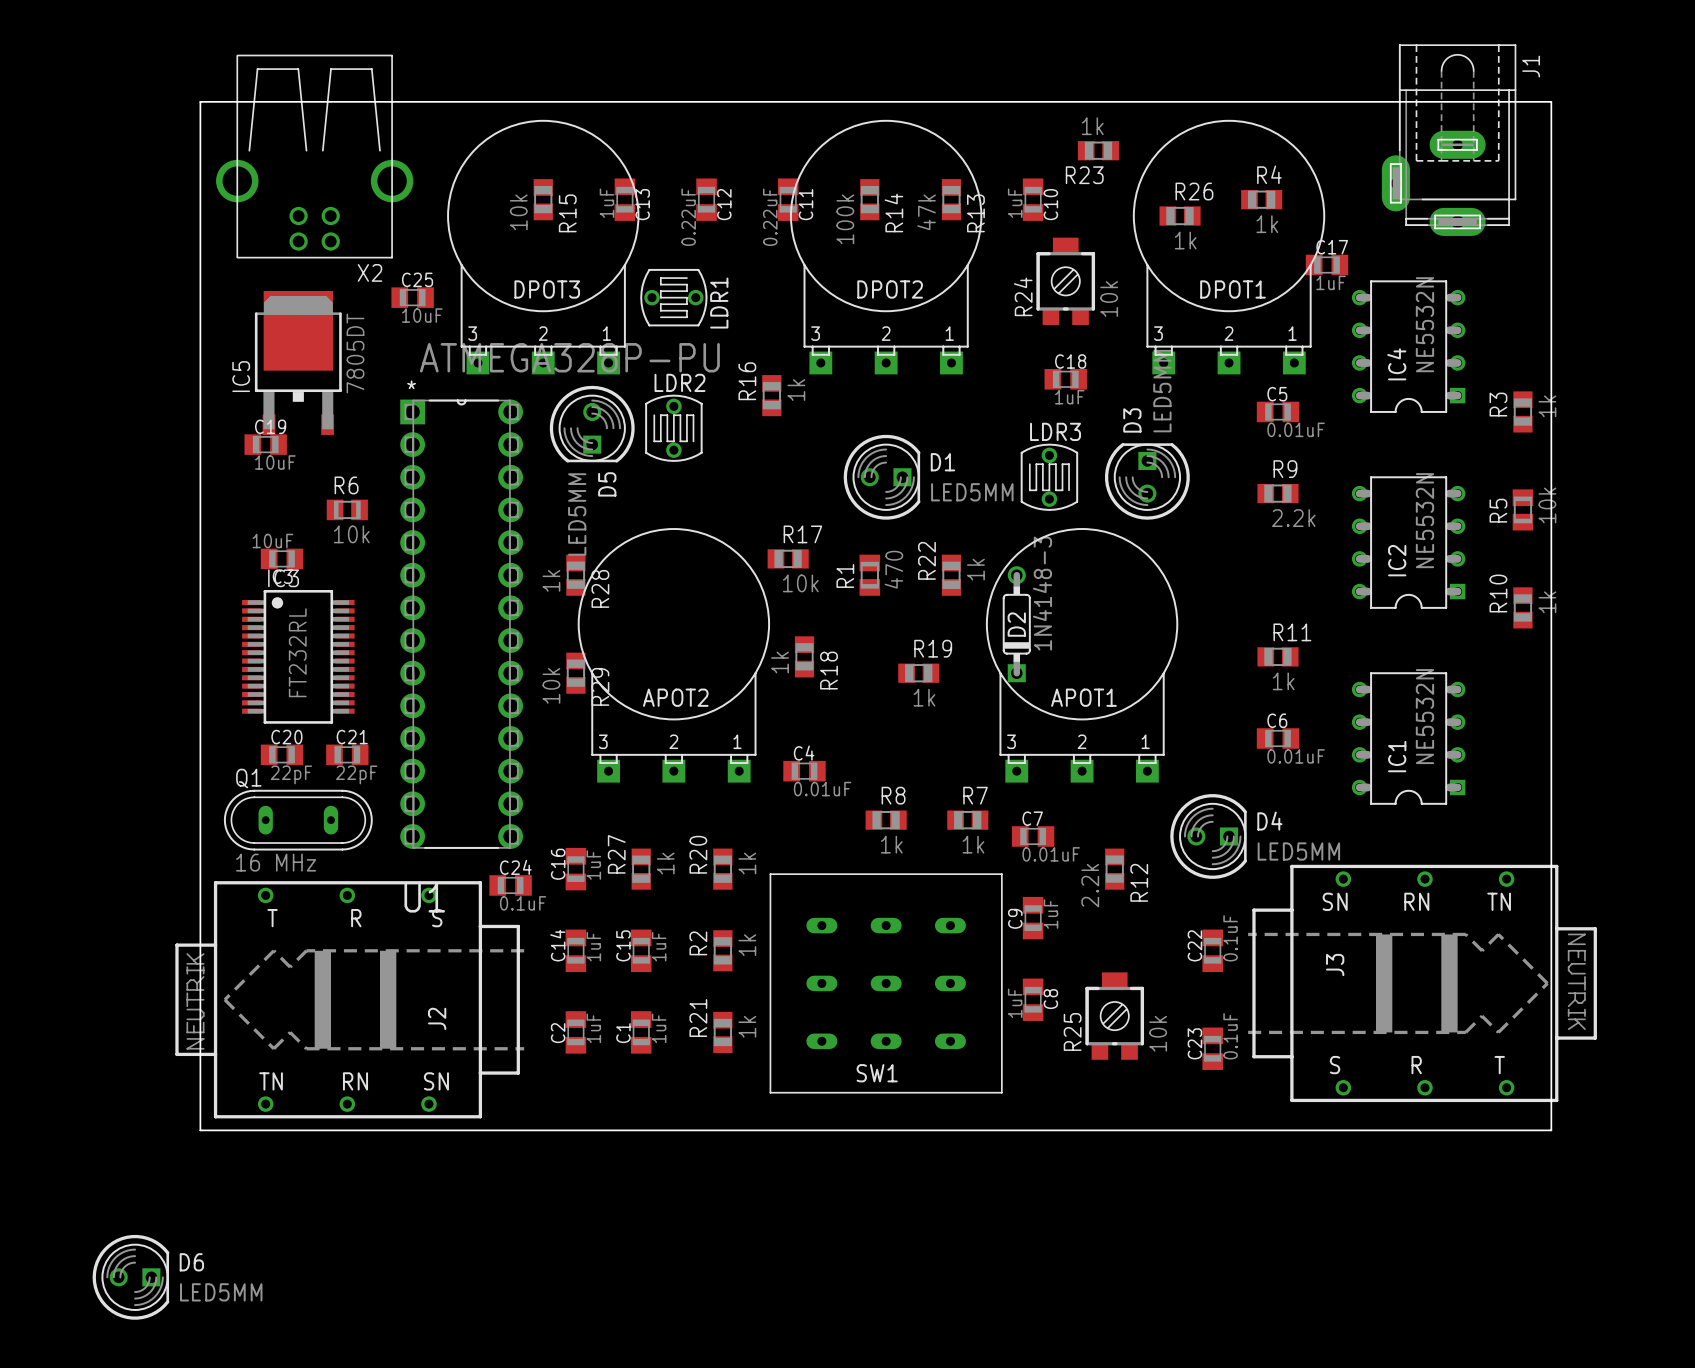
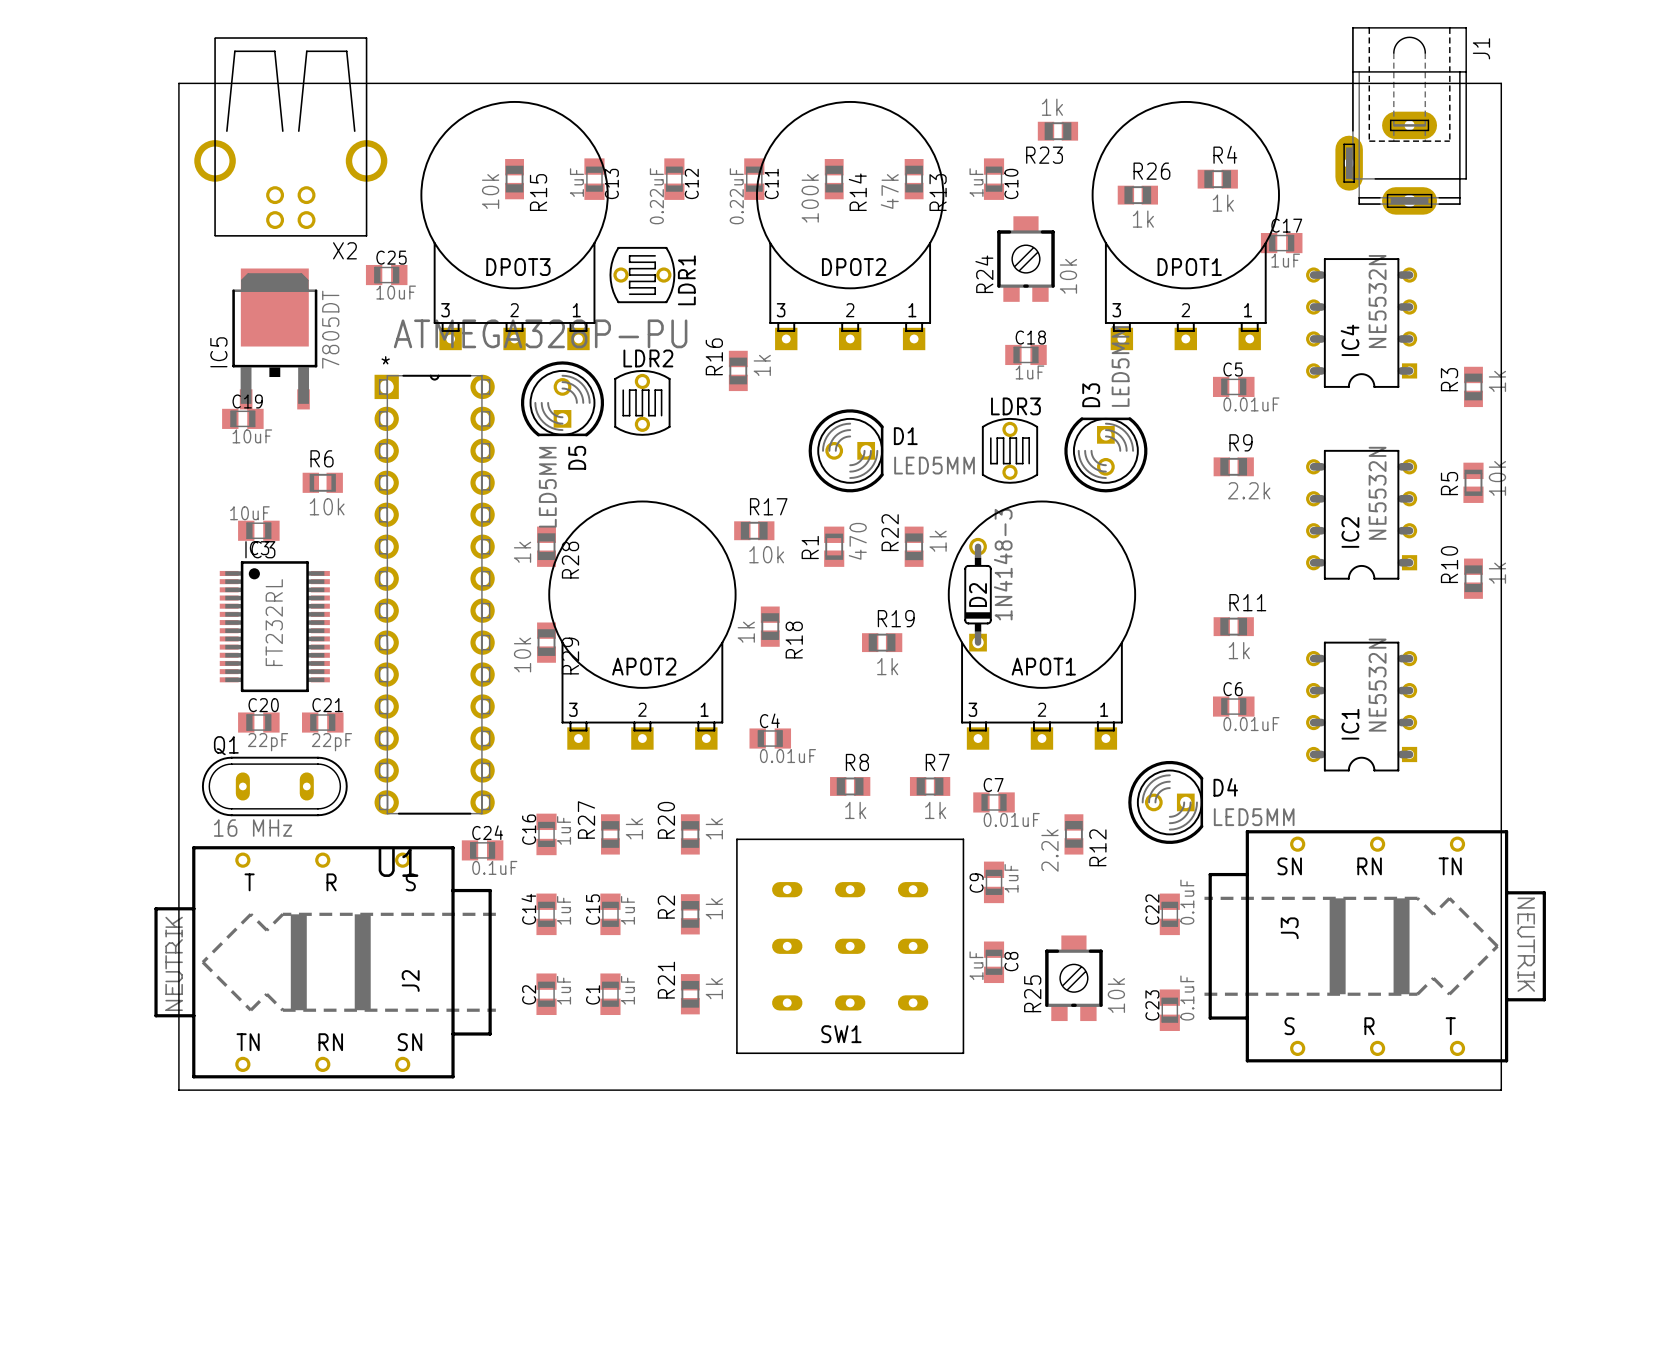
D6: LED5MM (130, 1277) -> none

